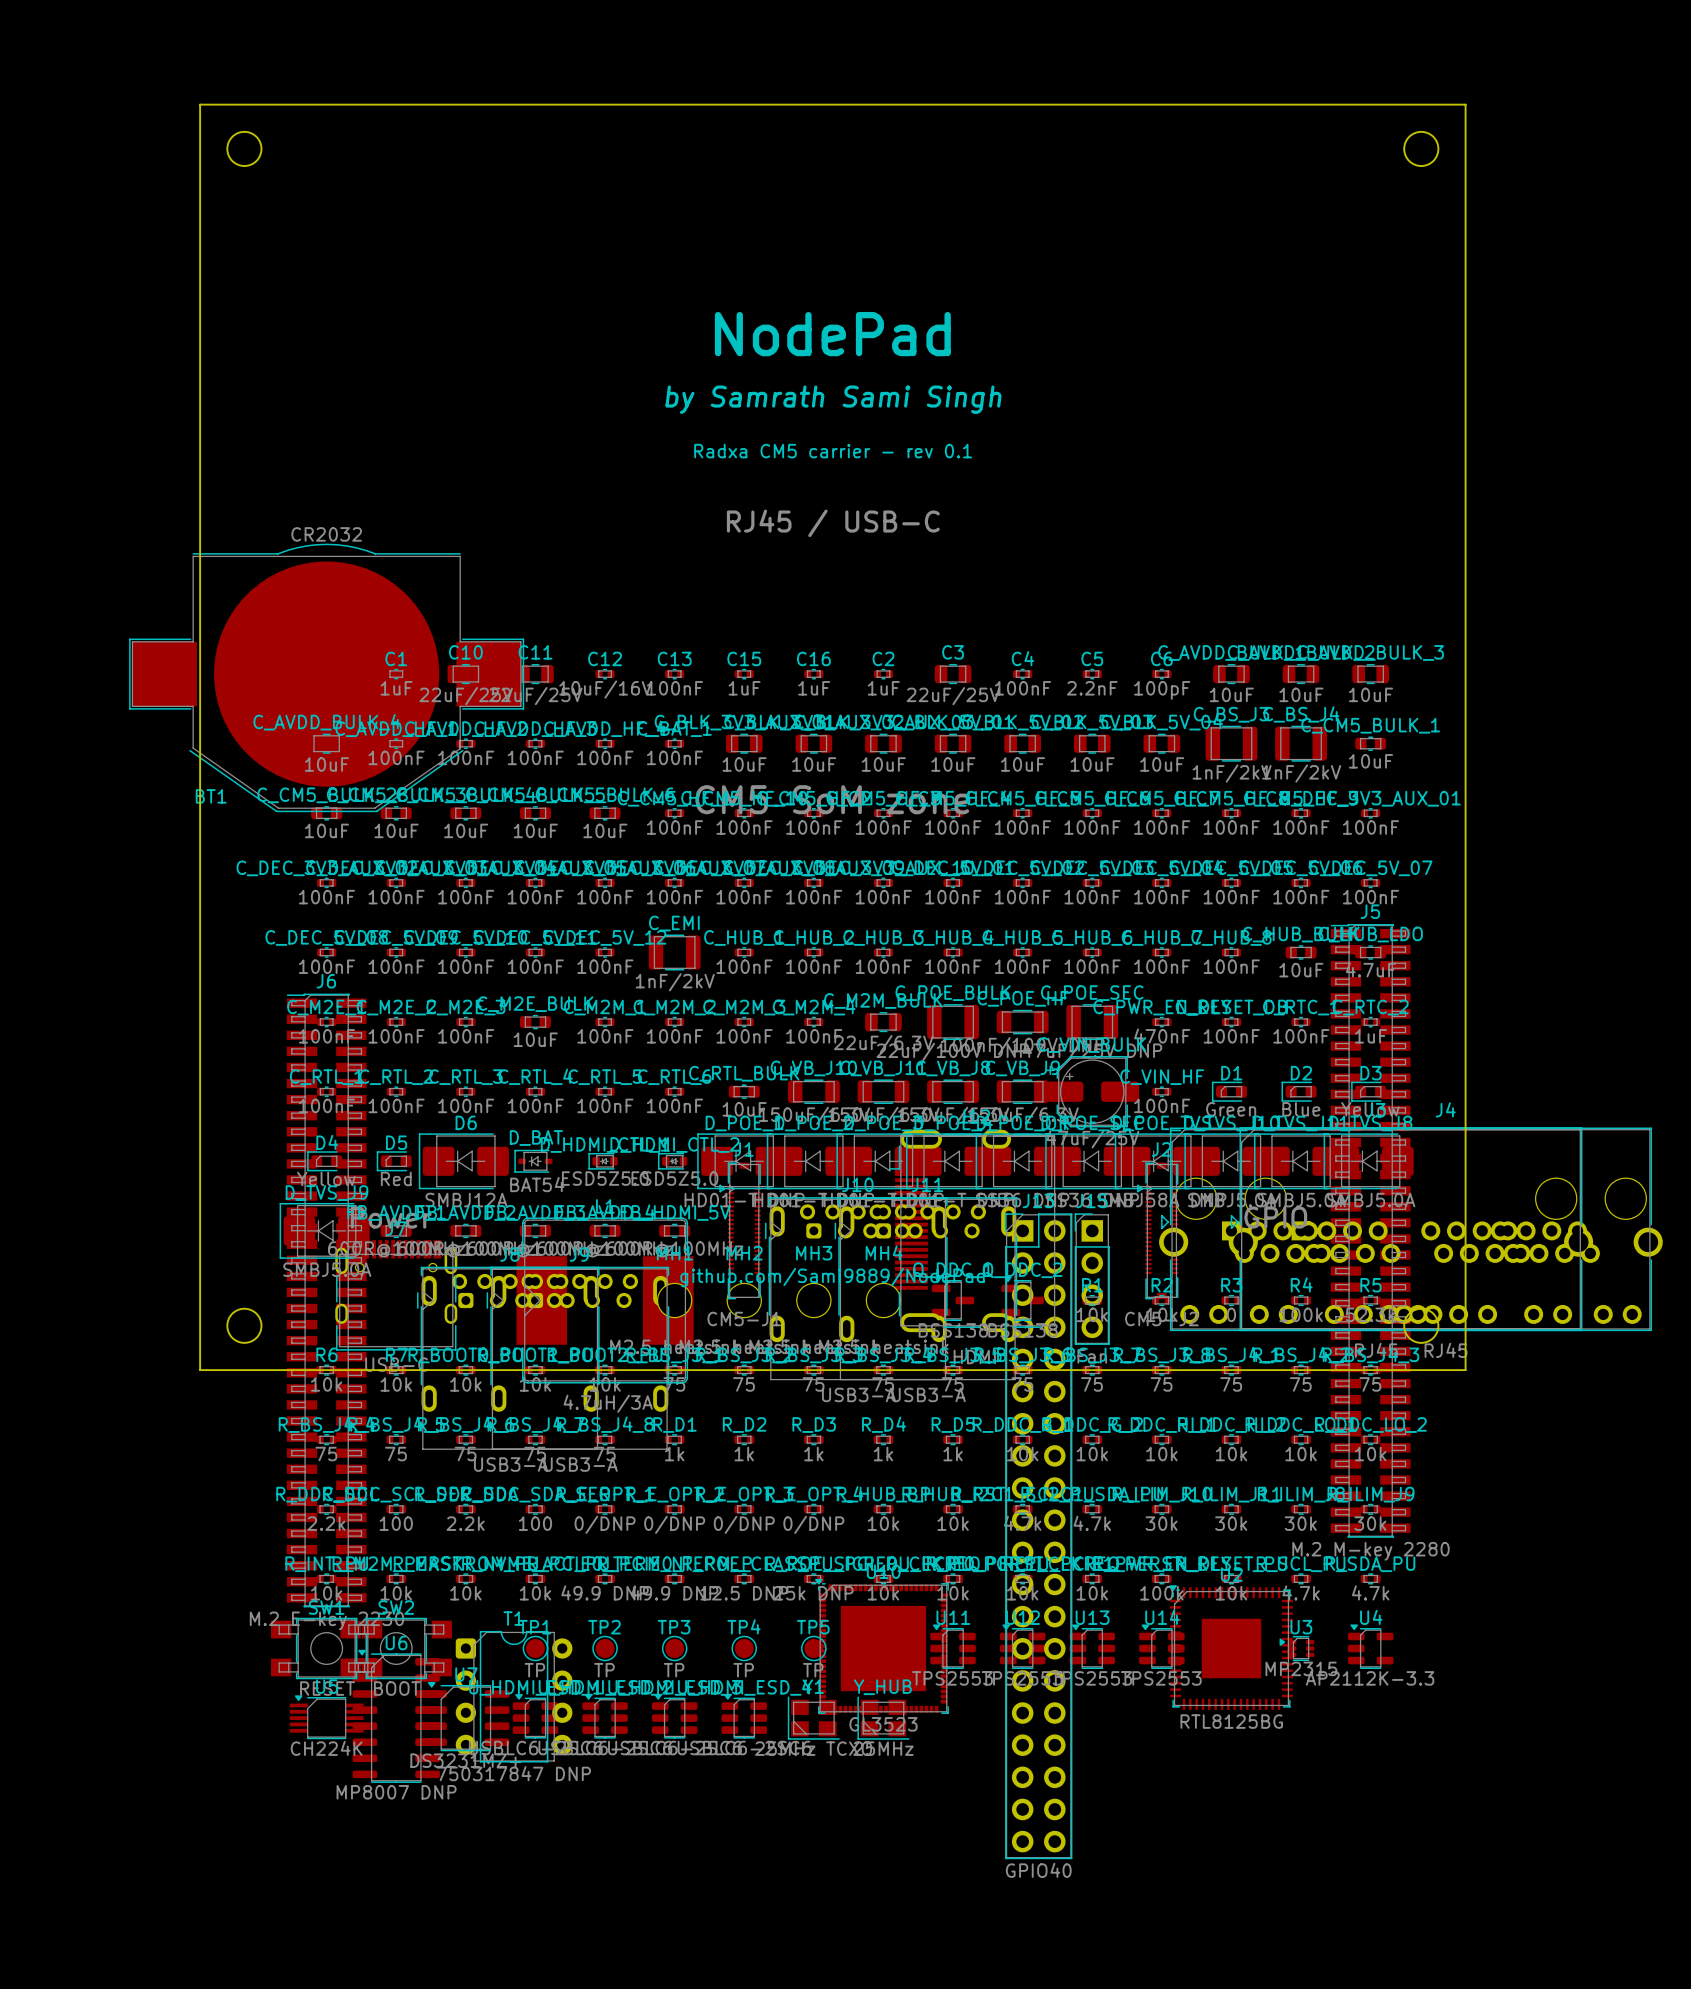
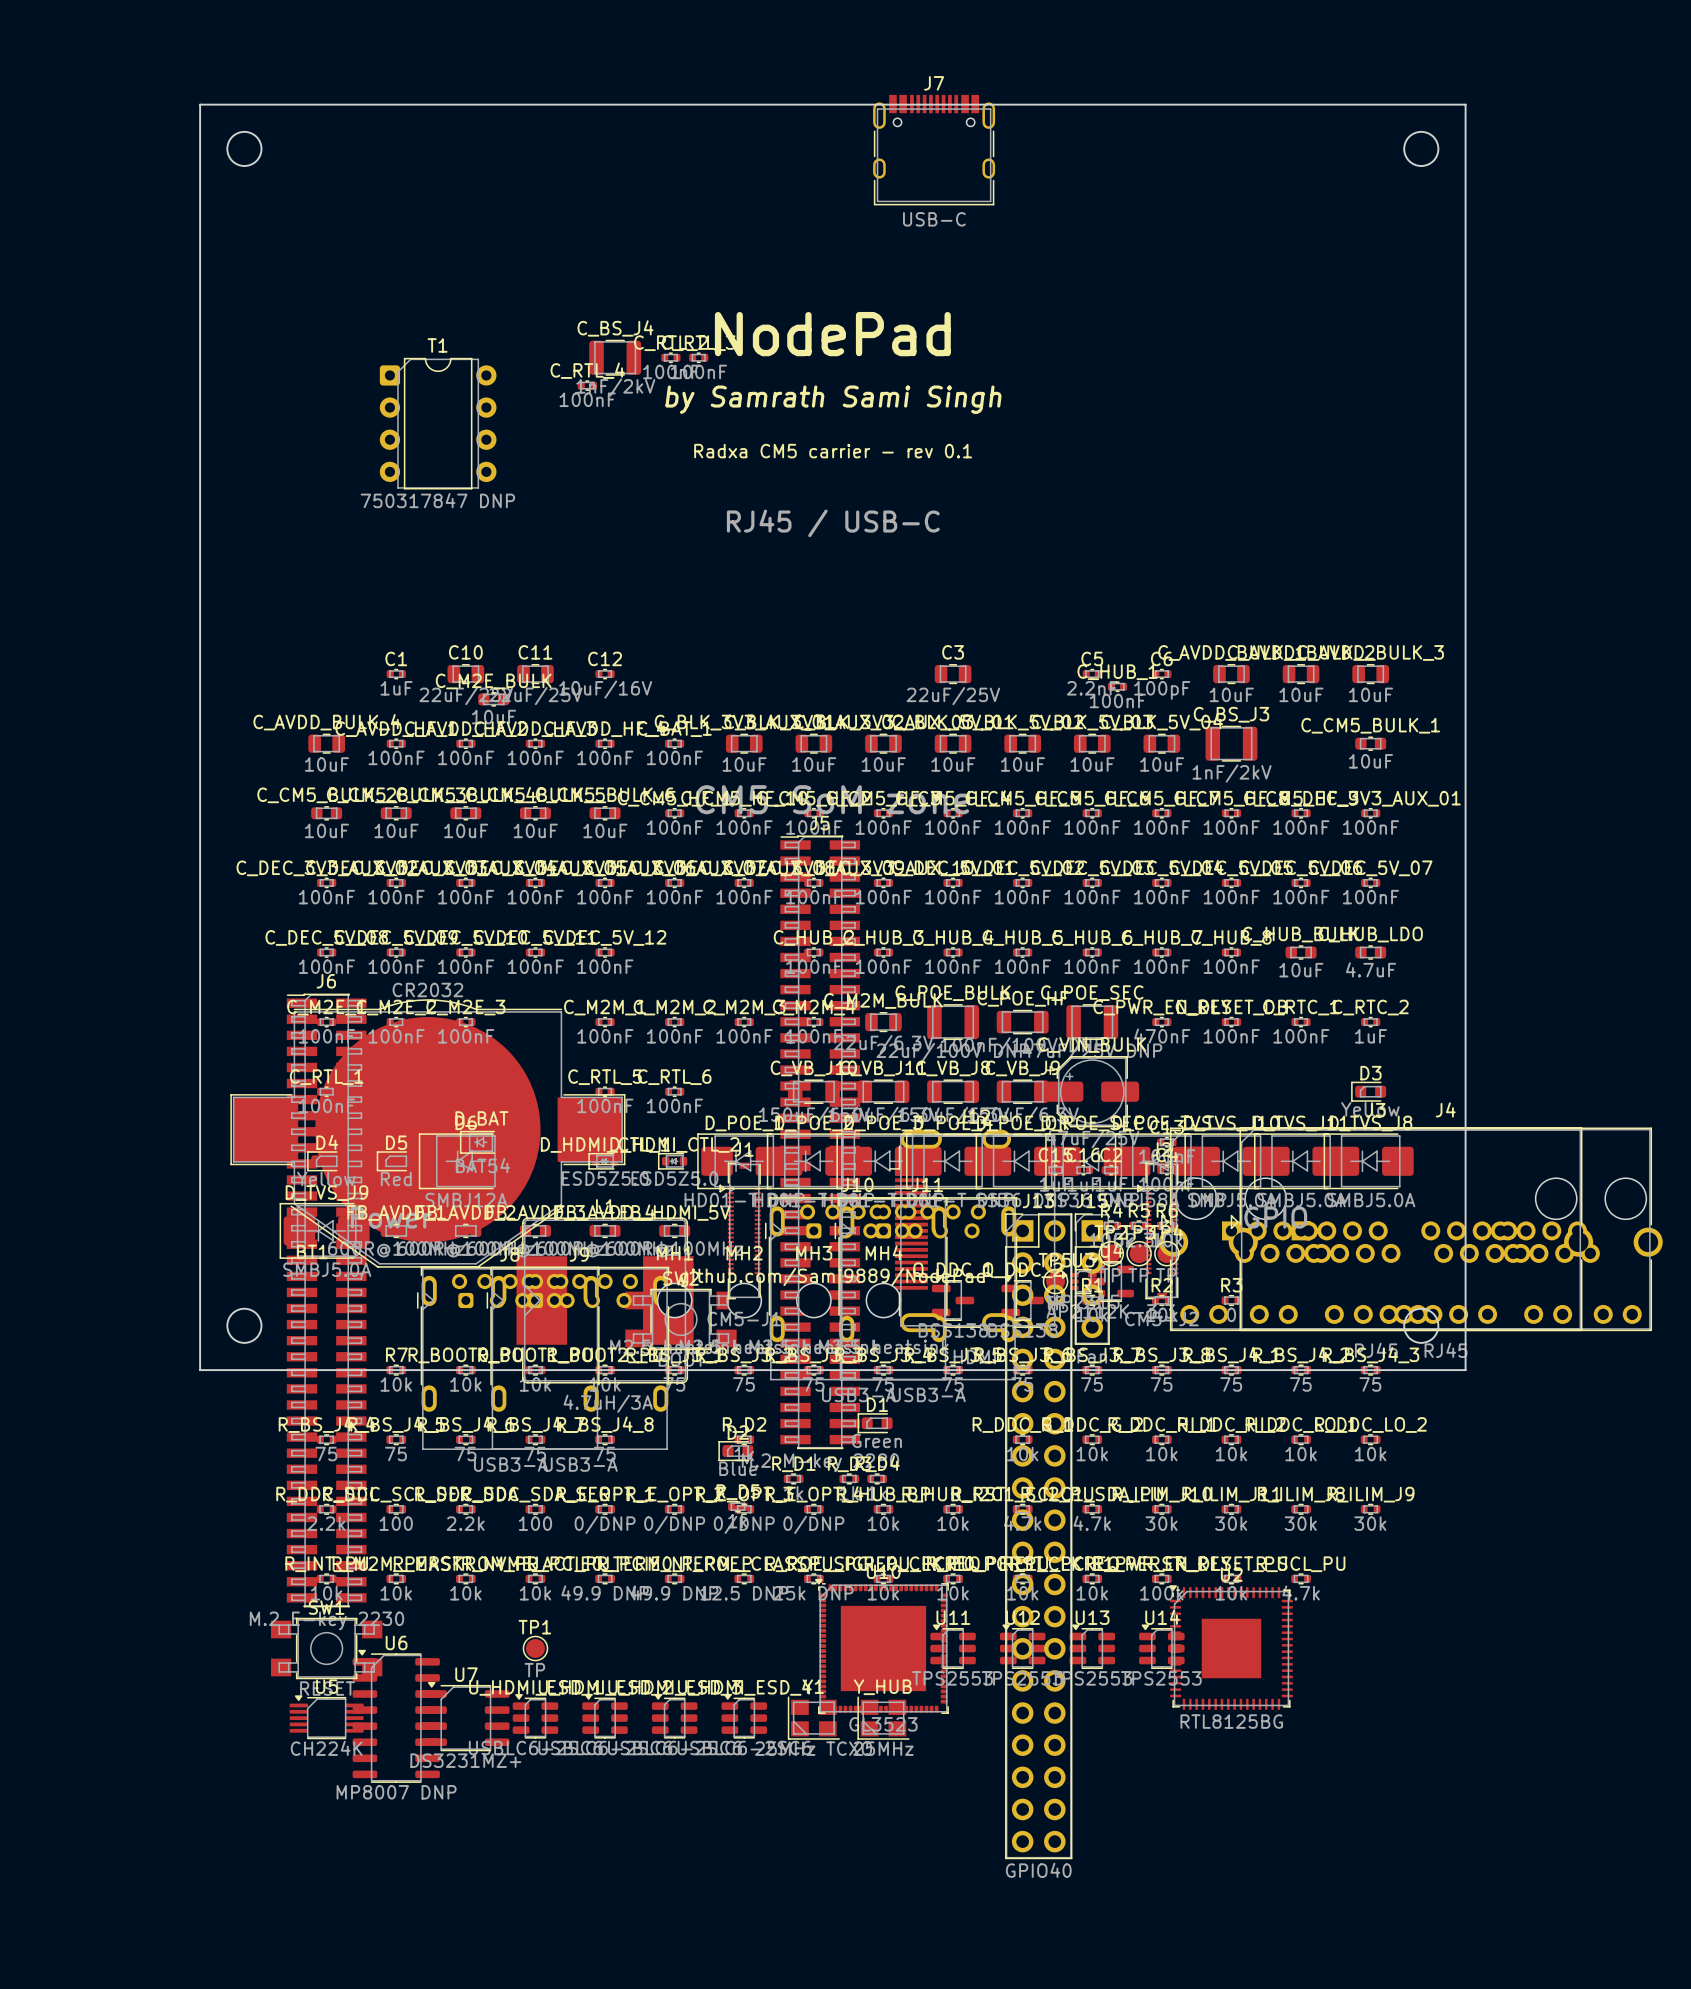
C13 position: (674, 674) -> (1166, 1142)
C15 position: (744, 674) -> (1055, 1170)
C16 position: (813, 674) -> (1083, 1170)
C2 position: (883, 674) -> (1111, 1170)
C4 position: (1022, 674) -> (1166, 1170)
BT1 position: (326, 677) -> (427, 1133)
C_BS_J4 position: (1301, 743) -> (615, 357)
C_EMI: 1nF/2kV (674, 952) -> none
C_HUB_1 position: (744, 952) -> (1117, 686)
C_M2E_BULK position: (535, 1022) -> (493, 699)
C_RTL_2 position: (396, 1091) -> (670, 357)
C_RTL_3 position: (465, 1091) -> (698, 357)
C_RTL_4 position: (535, 1091) -> (587, 385)
C_RTL_BULK: 10uF (744, 1091) -> none
C_VIN_HF: 100nF (1161, 1091) -> none
D1 position: (1229, 1091) -> (875, 1423)
D2 position: (1299, 1091) -> (735, 1451)
D_BAT position: (533, 1161) -> (479, 1142)
J5 position: (1370, 1230) -> (820, 1142)
J7 position: (396, 1295) -> (934, 150)
R4 position: (1301, 1300) -> (1111, 1225)
R5 position: (1370, 1300) -> (1139, 1225)
R6 position: (326, 1370) -> (1166, 1225)
R_D1 position: (674, 1439) -> (793, 1478)
R_D3 position: (813, 1439) -> (849, 1478)
R_D4 position: (883, 1439) -> (877, 1478)
R_D5 position: (953, 1439) -> (737, 1506)
R_SDA_PU: 4.7k (1370, 1578) -> none
U4 position: (1370, 1646) -> (1111, 1279)
SW2 position: (396, 1648) -> (680, 1319)
TP2 position: (605, 1648) -> (1111, 1253)
TP3 position: (674, 1648) -> (1139, 1253)
TP4 position: (744, 1648) -> (1166, 1253)
TP5 position: (813, 1648) -> (1055, 1281)
U3 position: (1296, 1648) -> (1079, 1281)
T1 position: (514, 1696) -> (438, 423)

